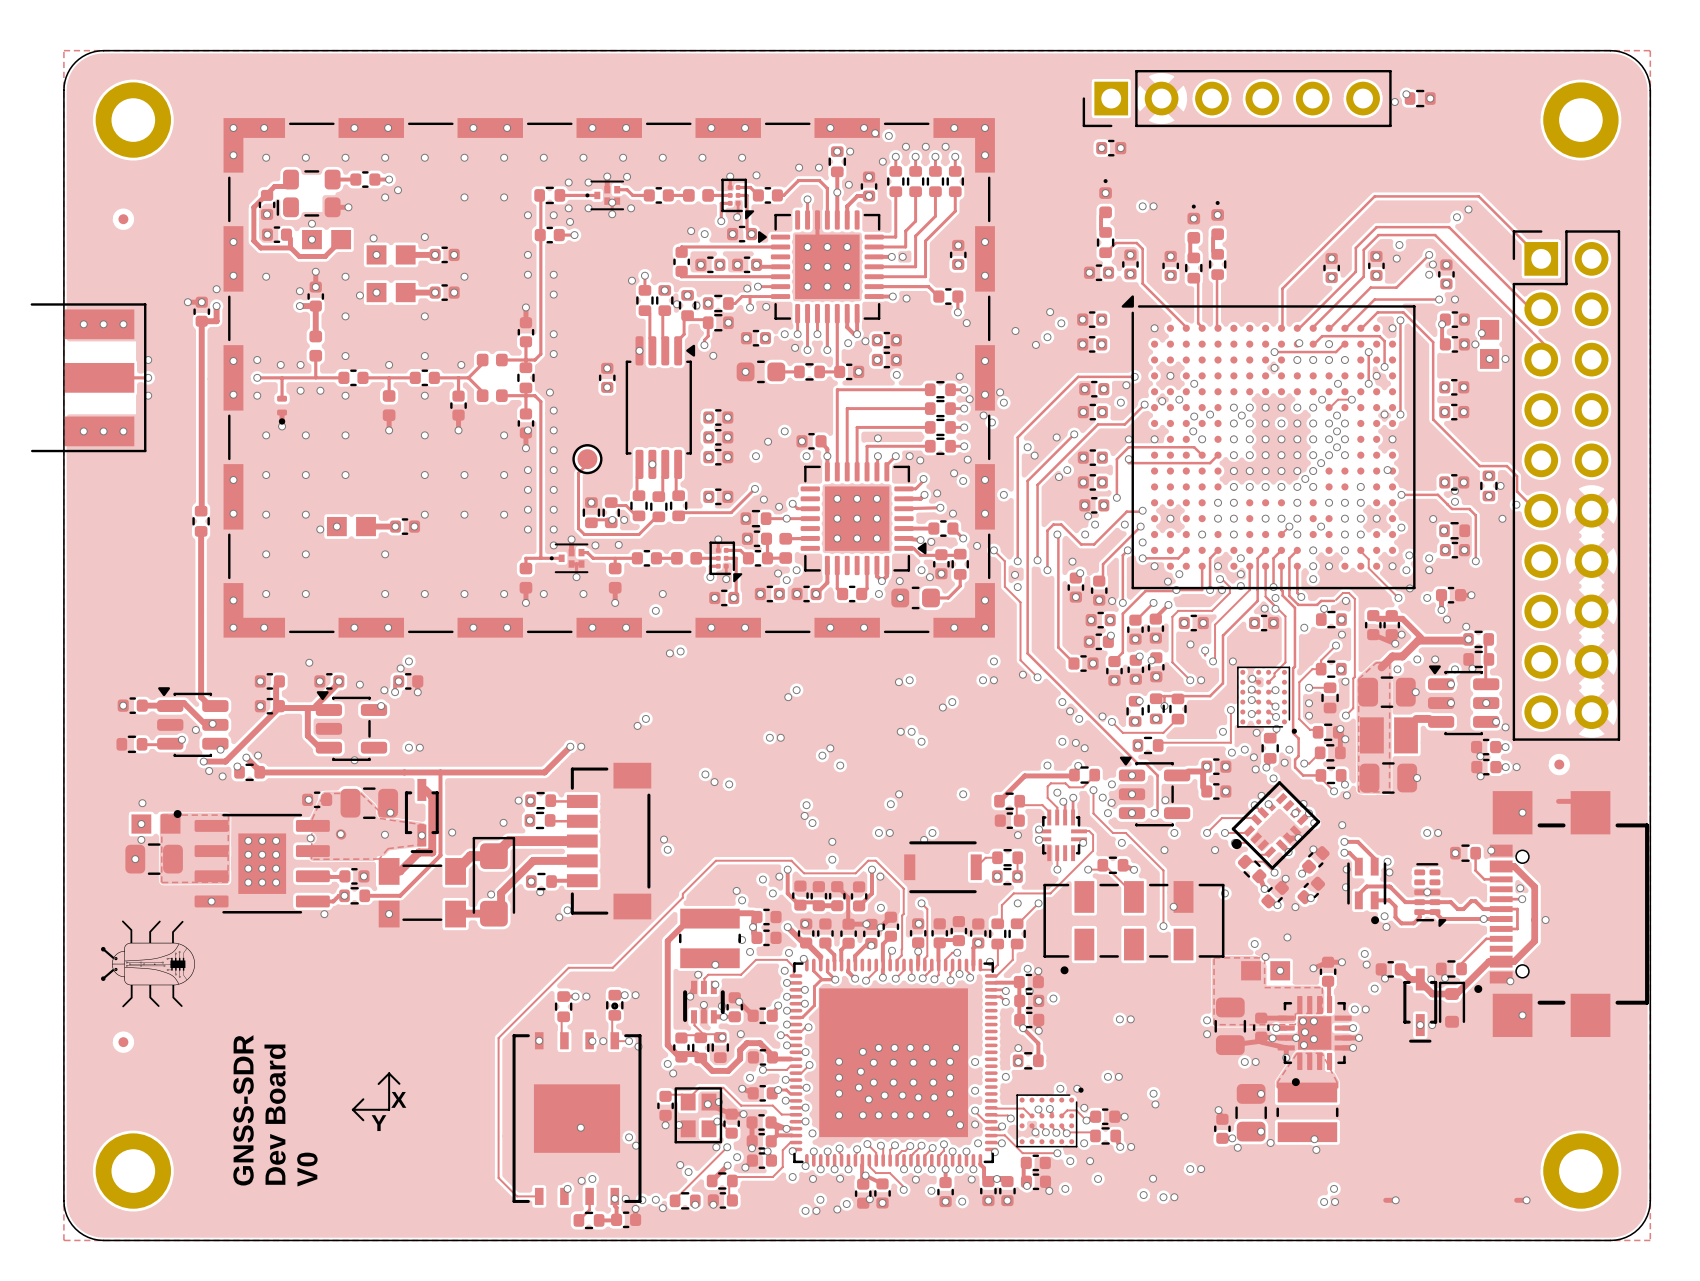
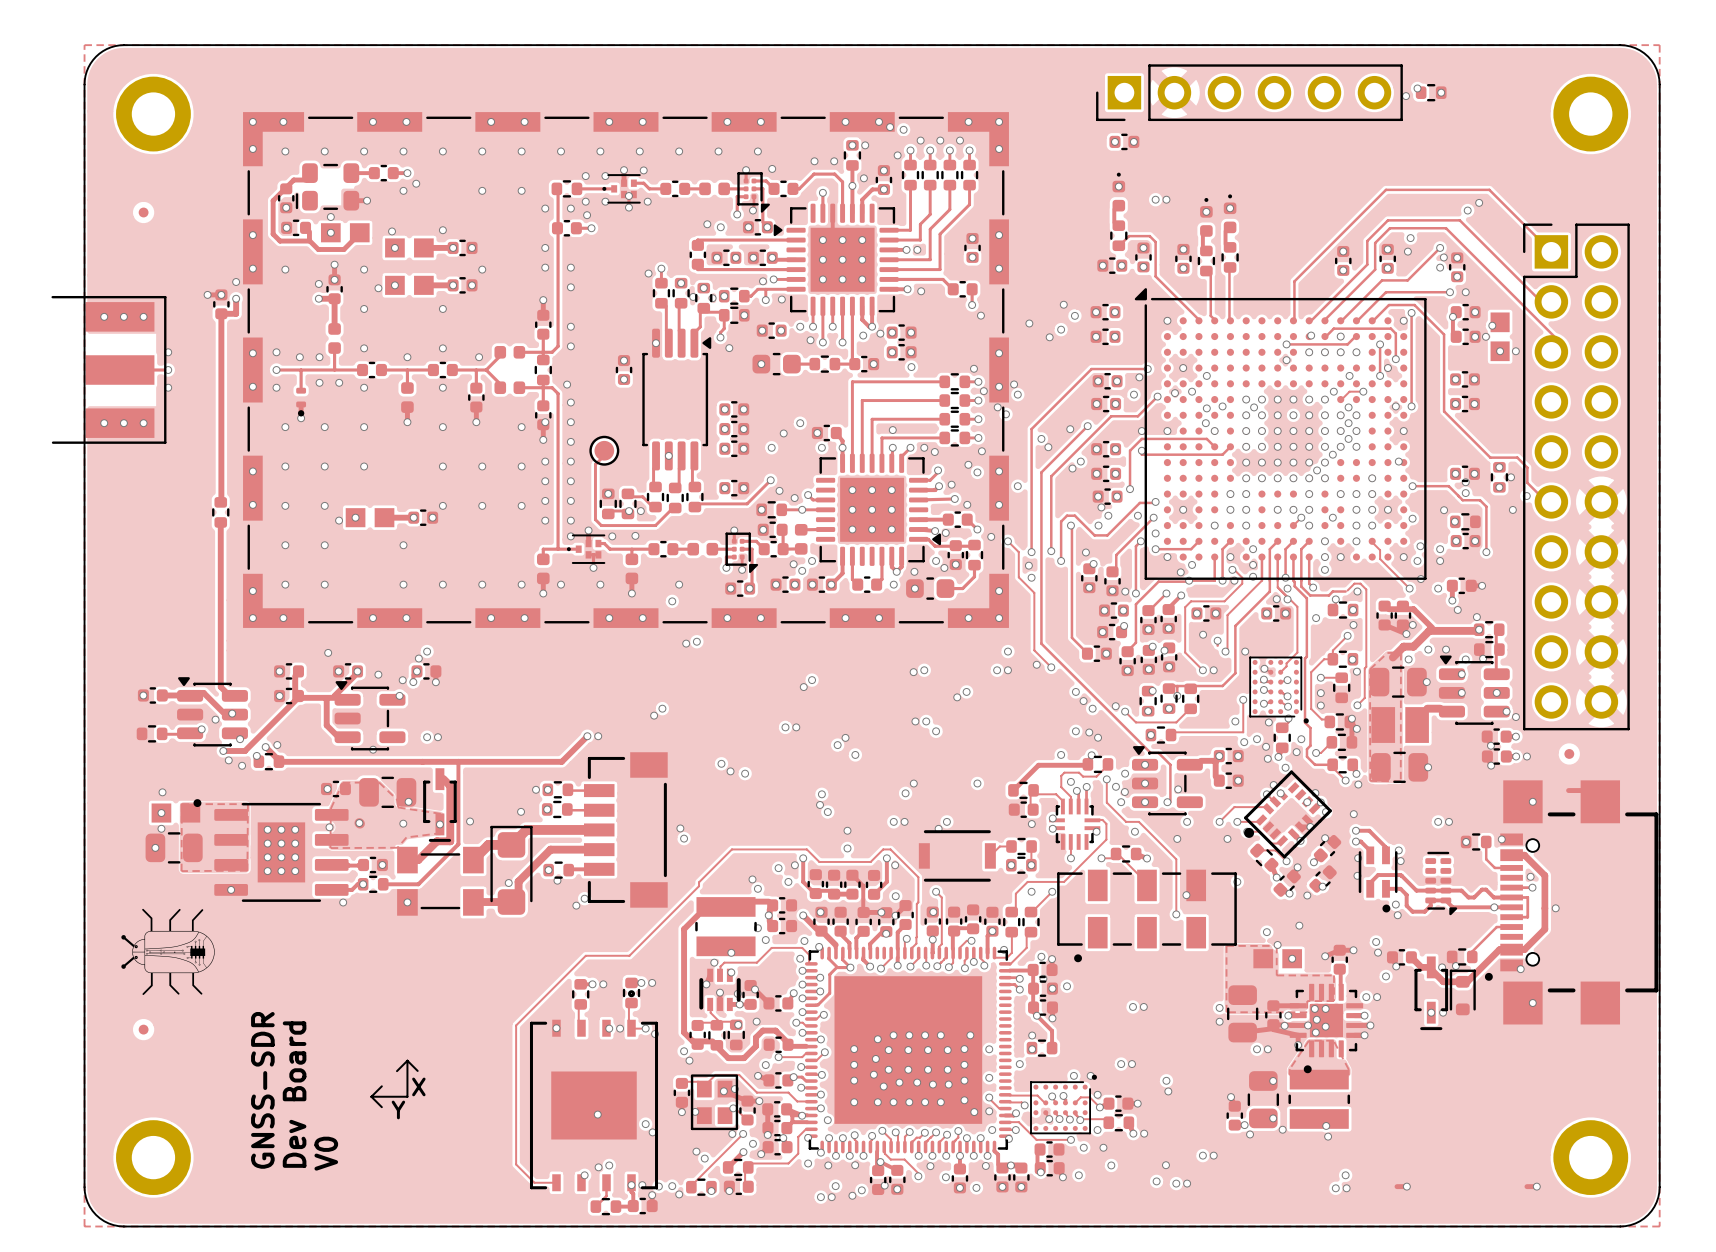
via: (1427, 892) -> none

